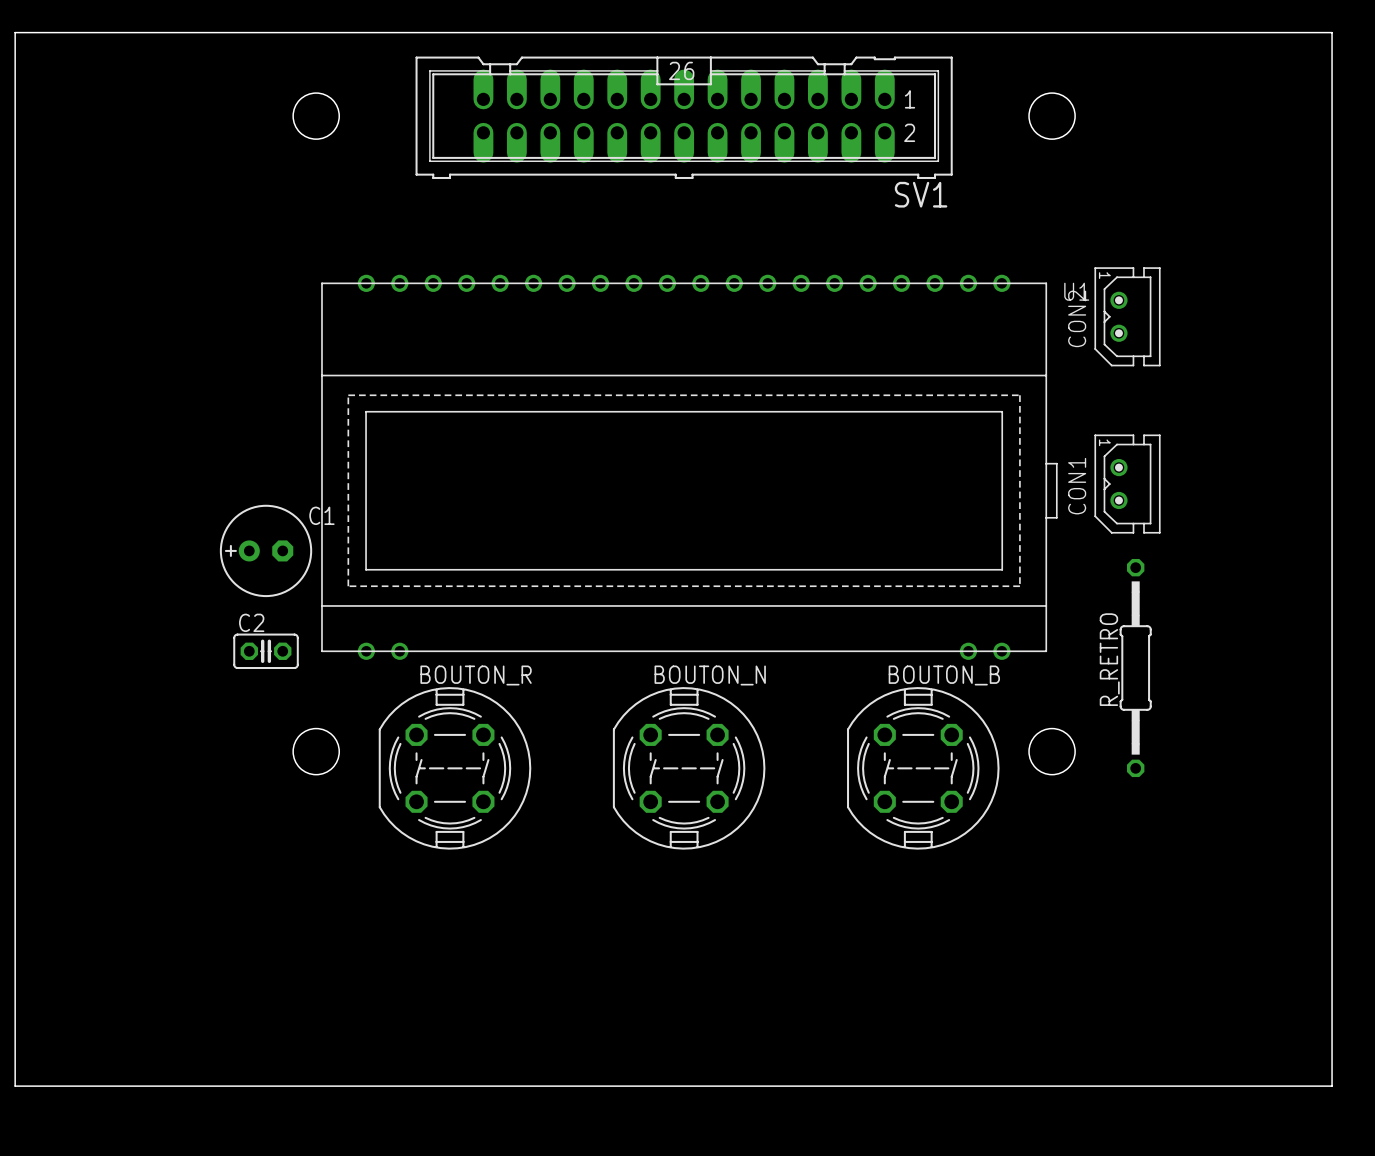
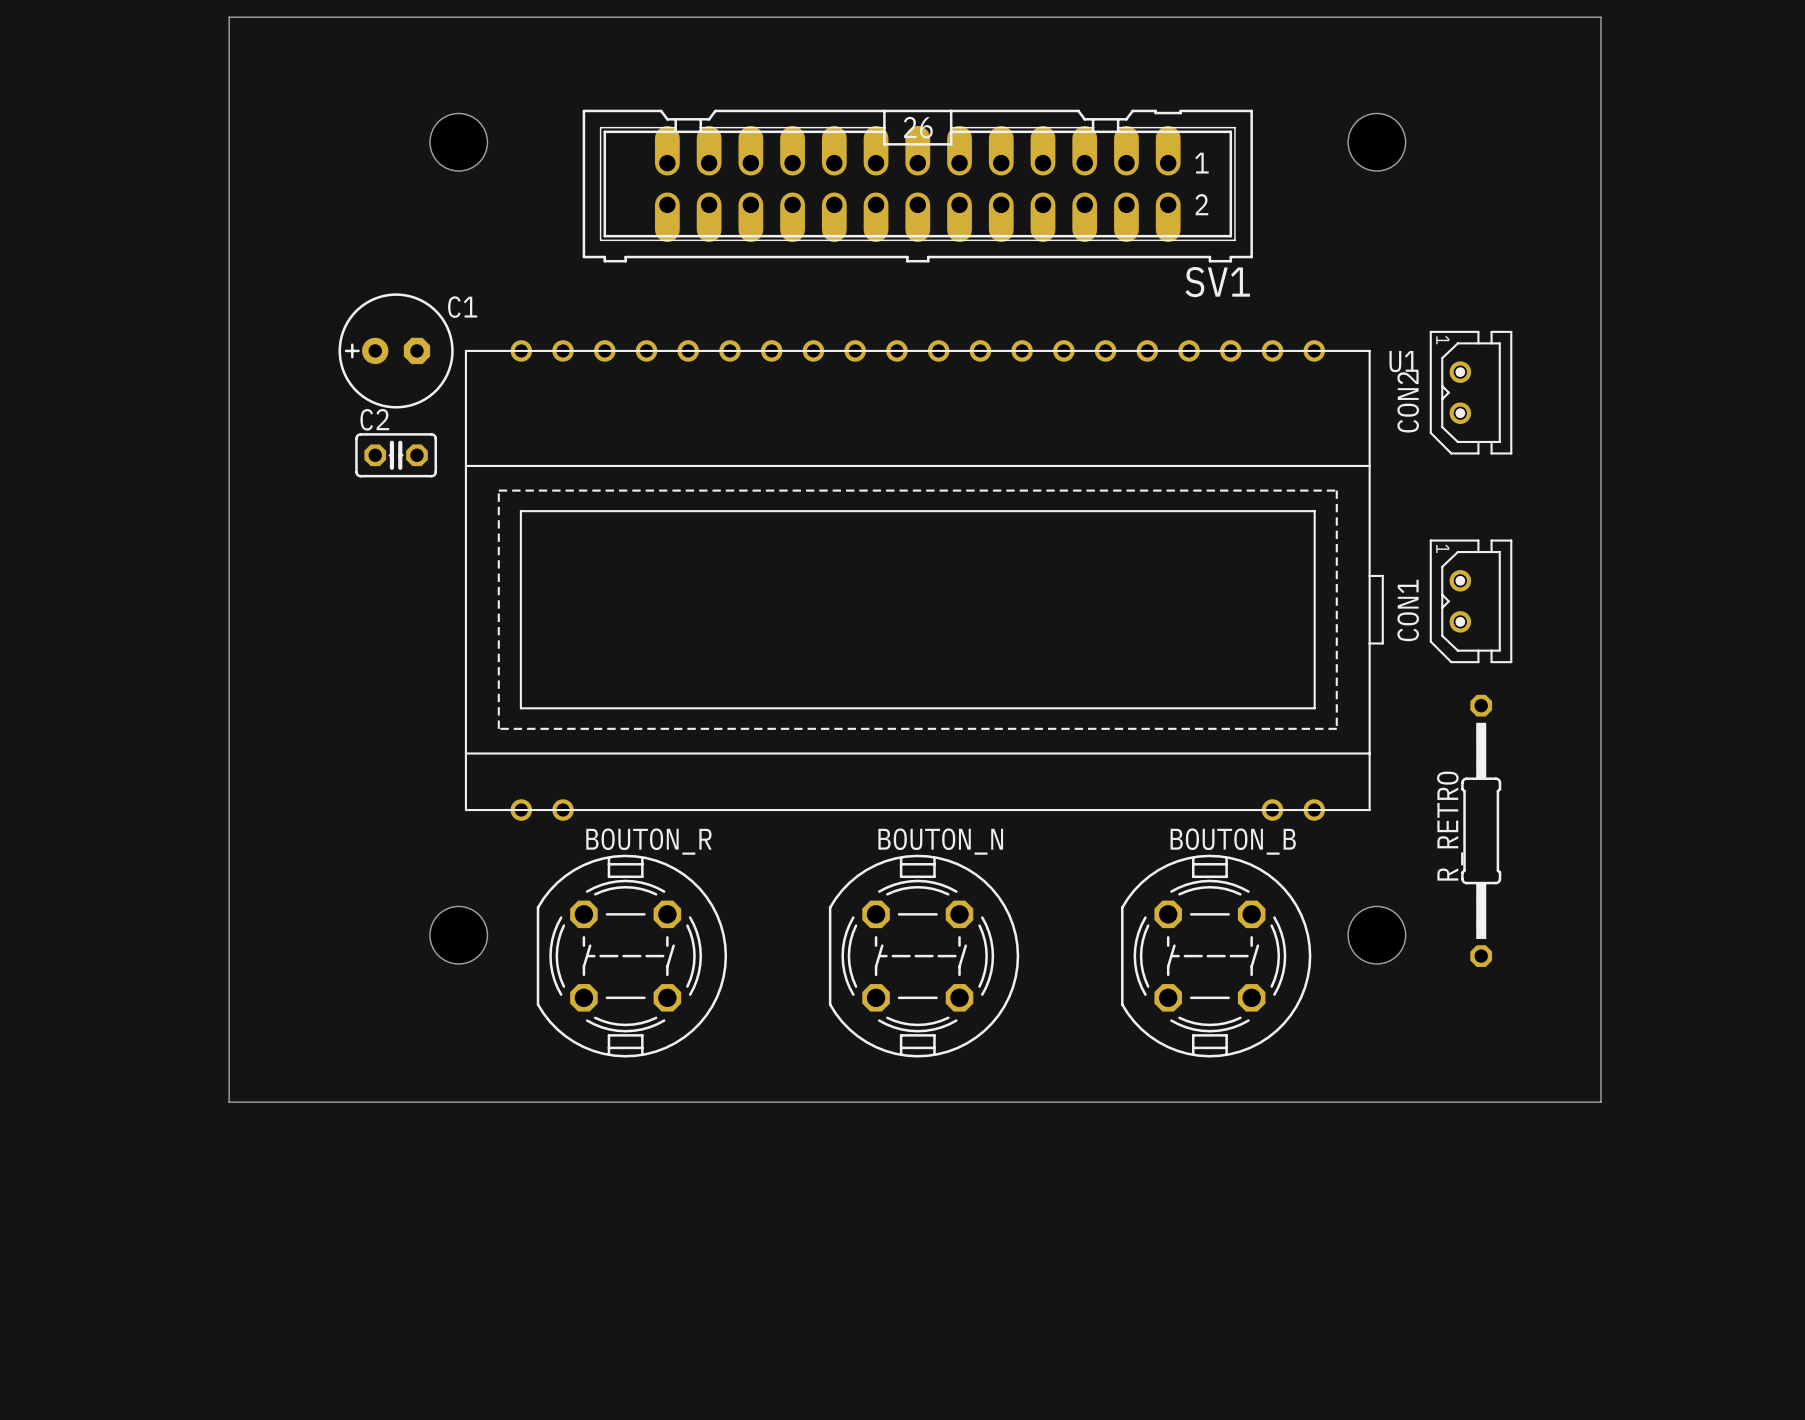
board edge: (15, 32) (1332, 32) (1332, 1086) (15, 1086) (15, 32) -> (229, 17) (229, 1102) (1600, 1102) (1600, 17) (229, 17)
SV1 position: (684, 117) -> (917, 186)
C1 position: (266, 550) -> (396, 350)
C2 position: (266, 651) -> (396, 455)

